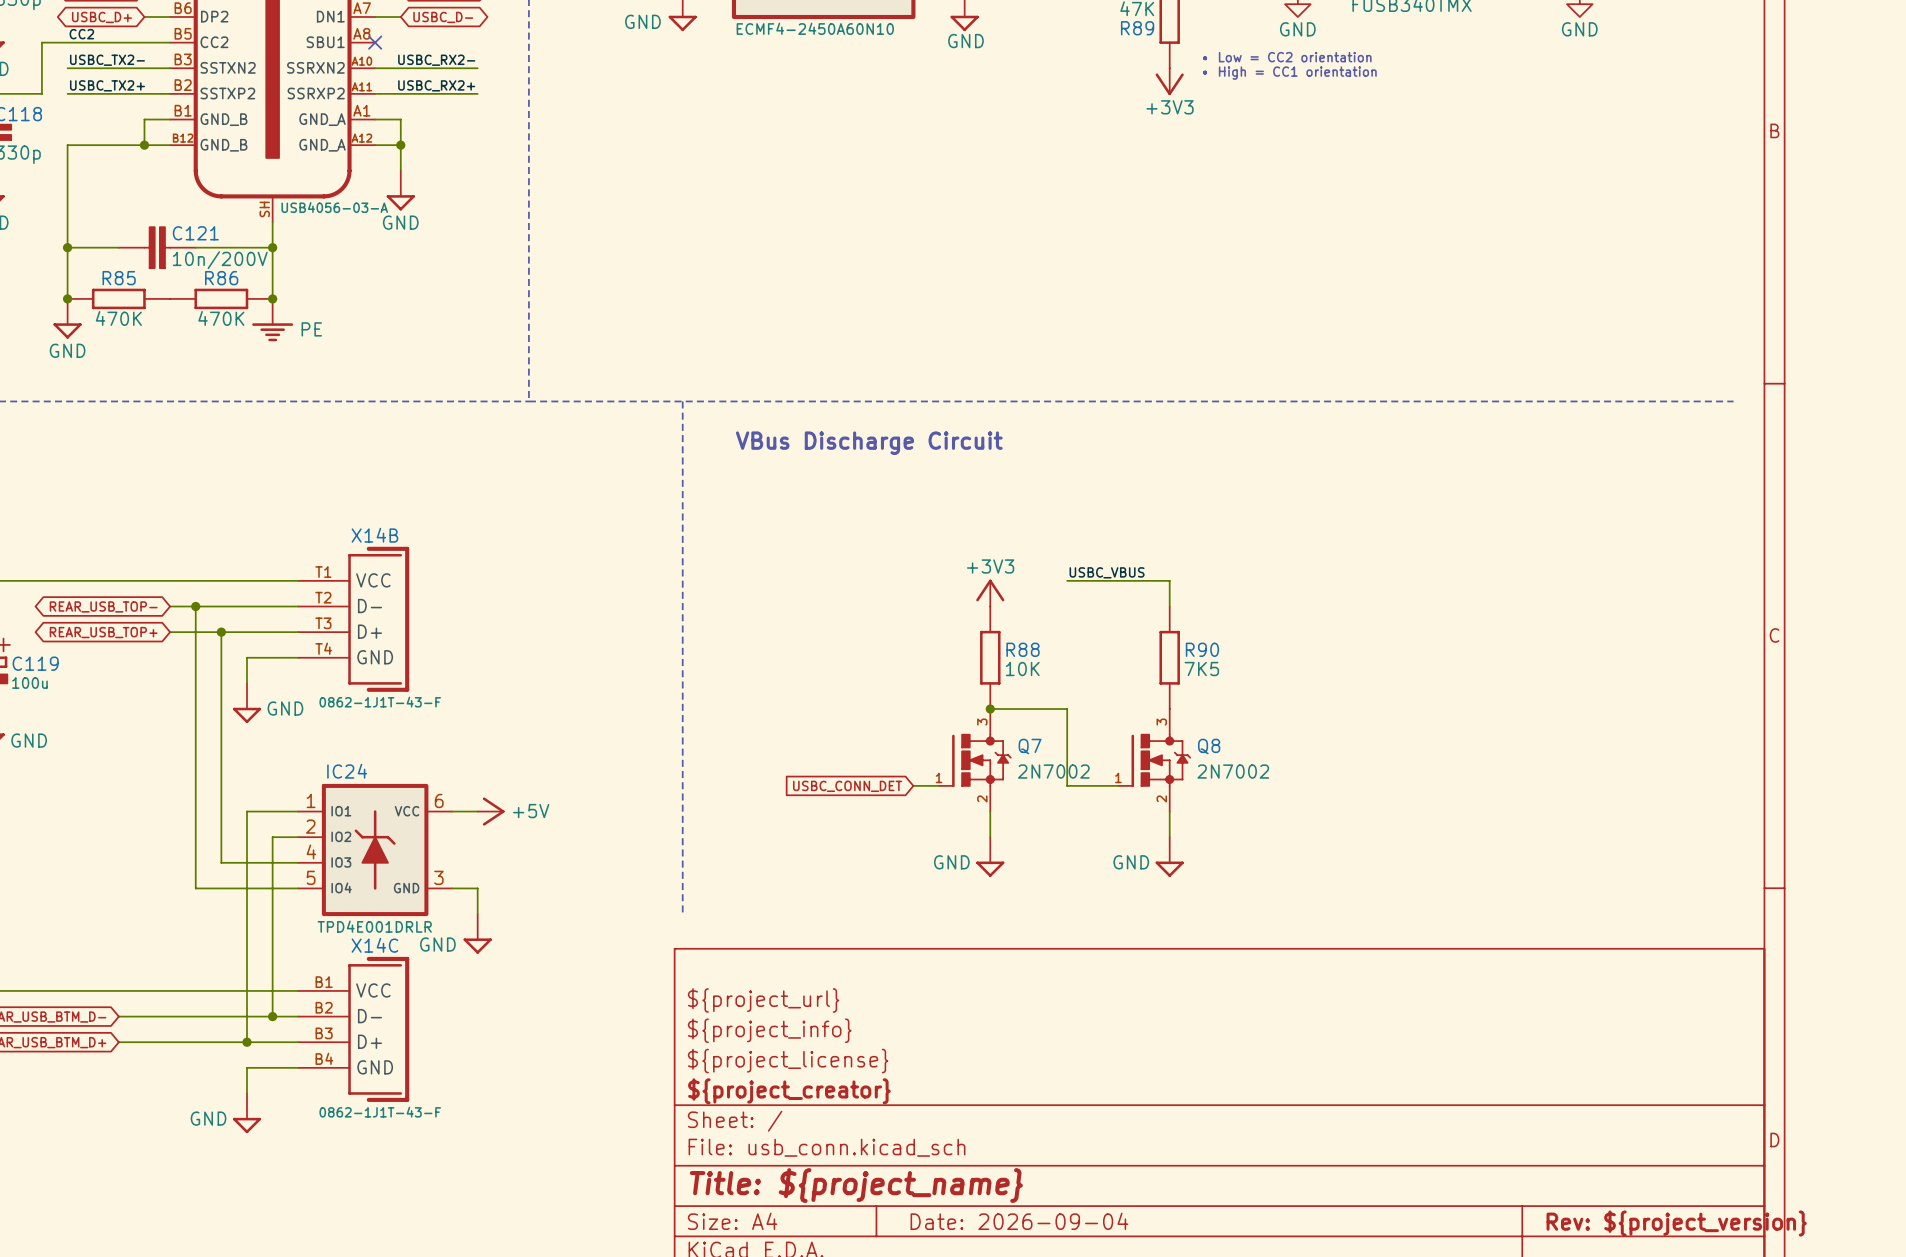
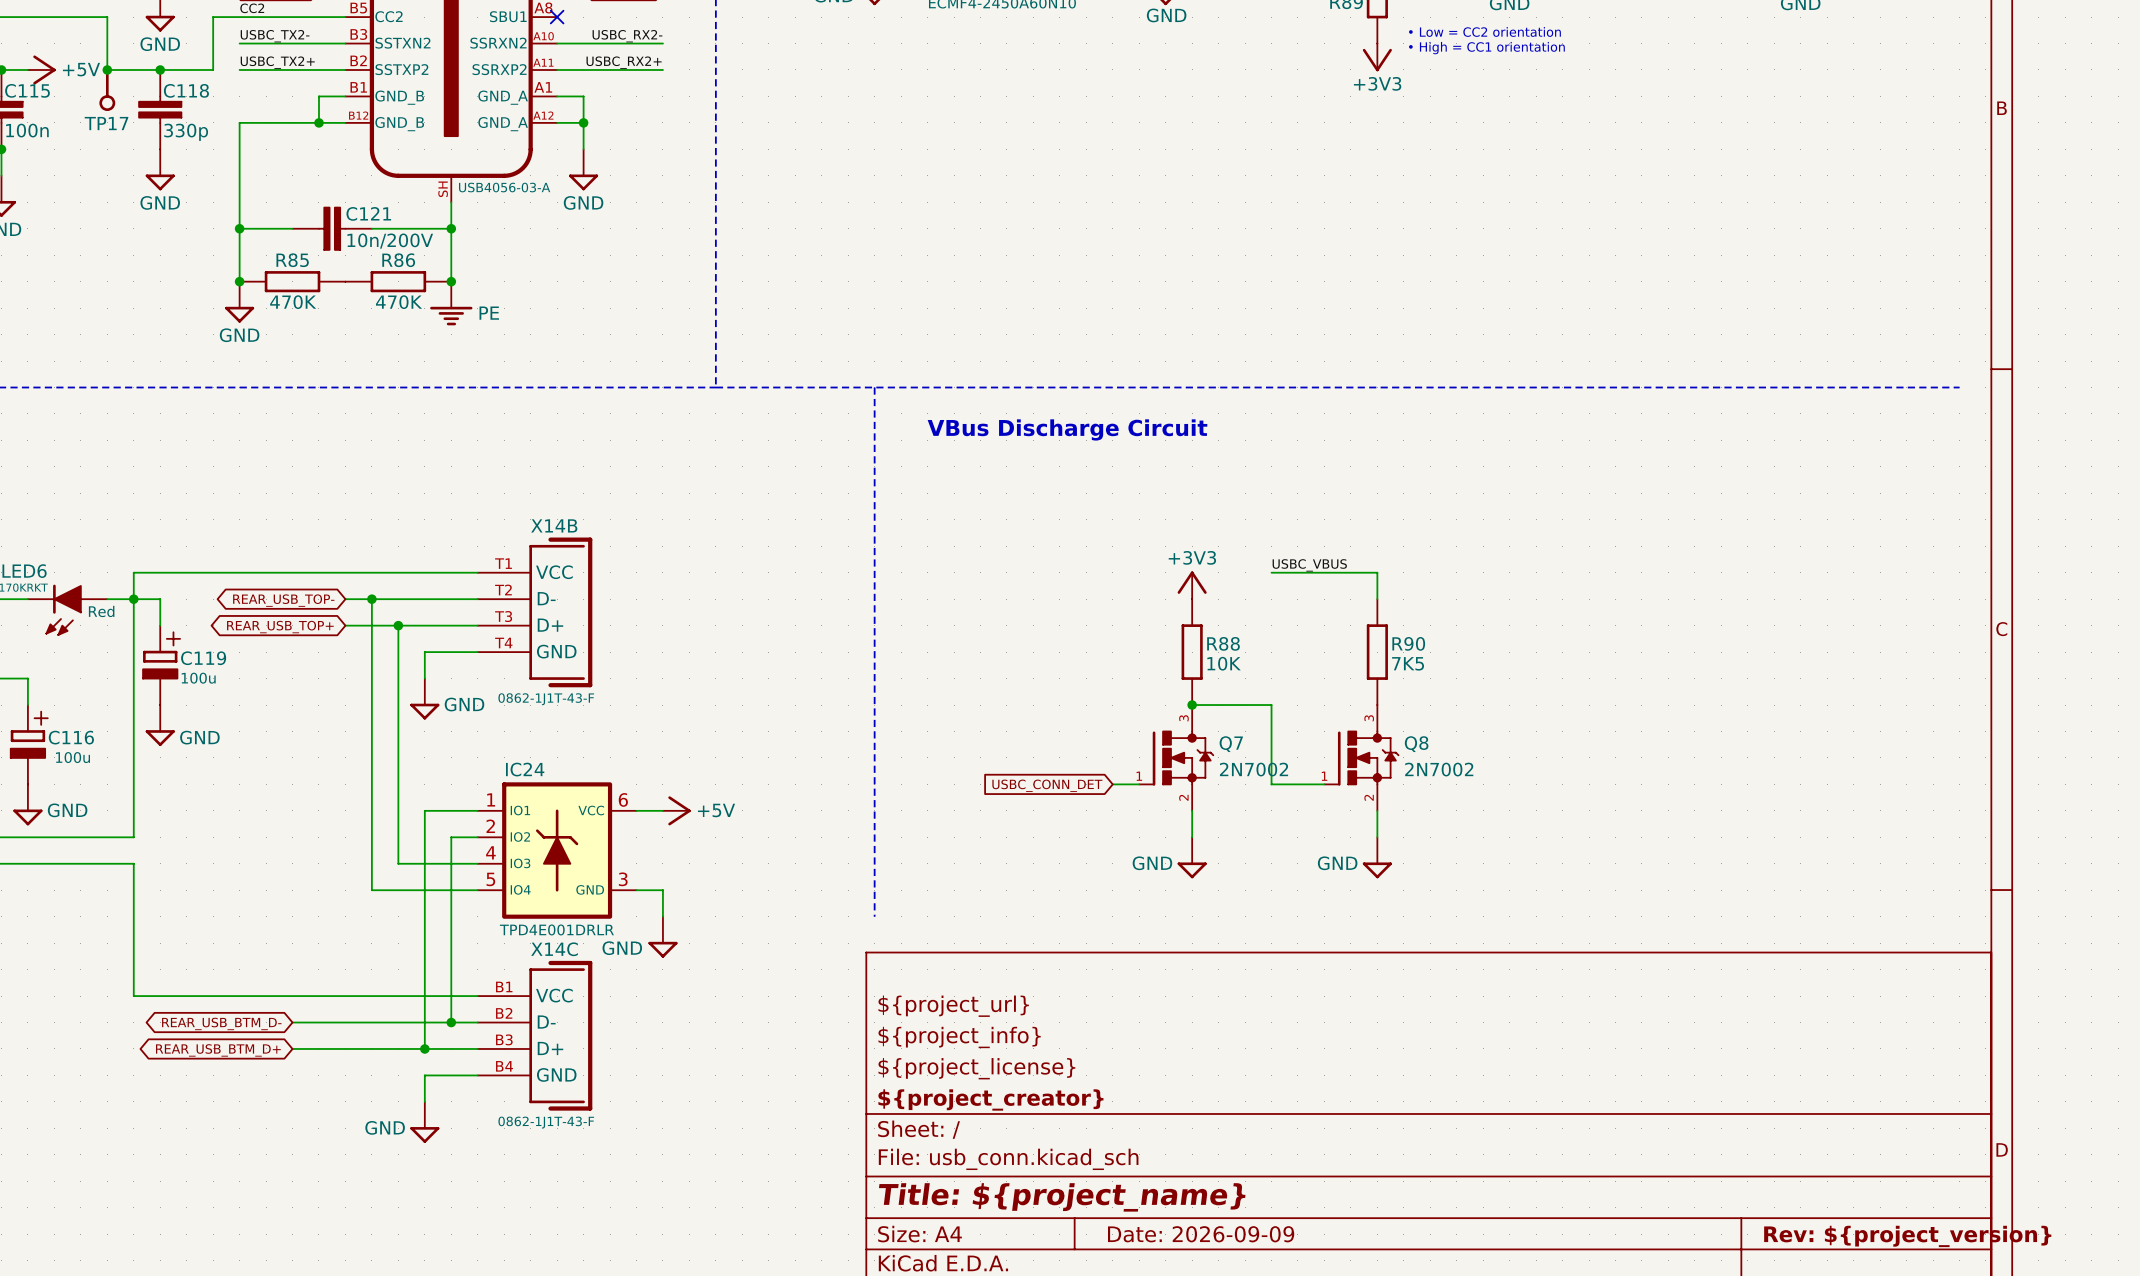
title block: Date: 2026-09-04 (1019, 1221) -> Date: 2026-09-09 (1201, 1234)

